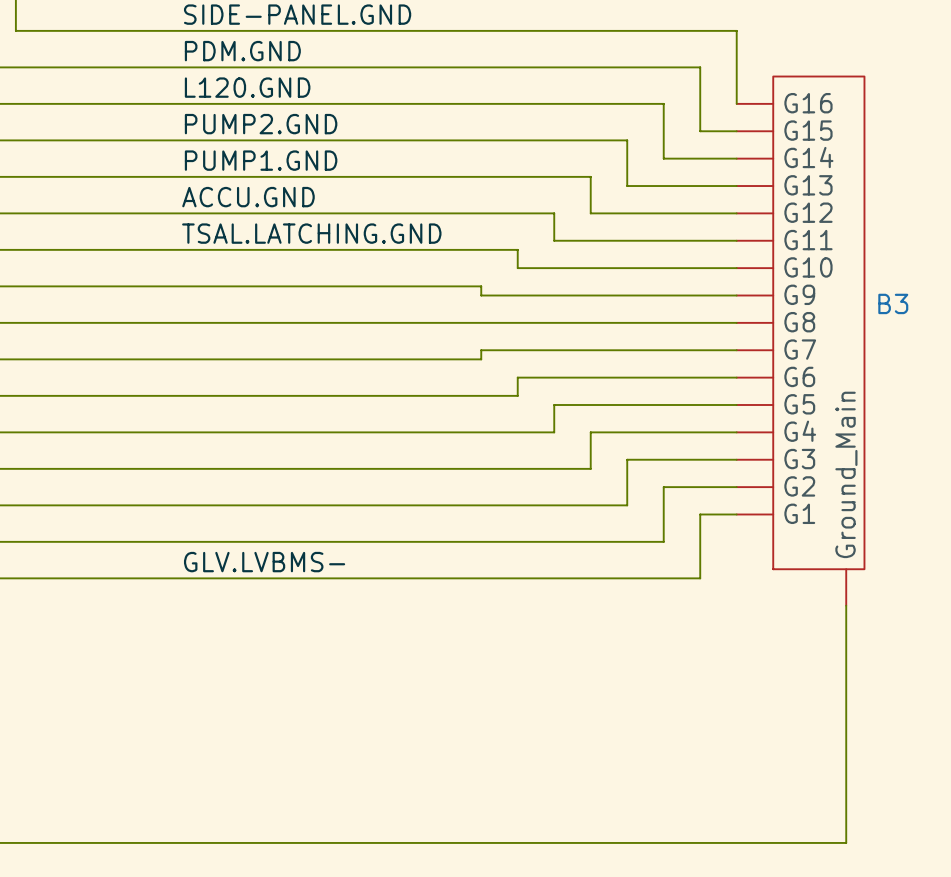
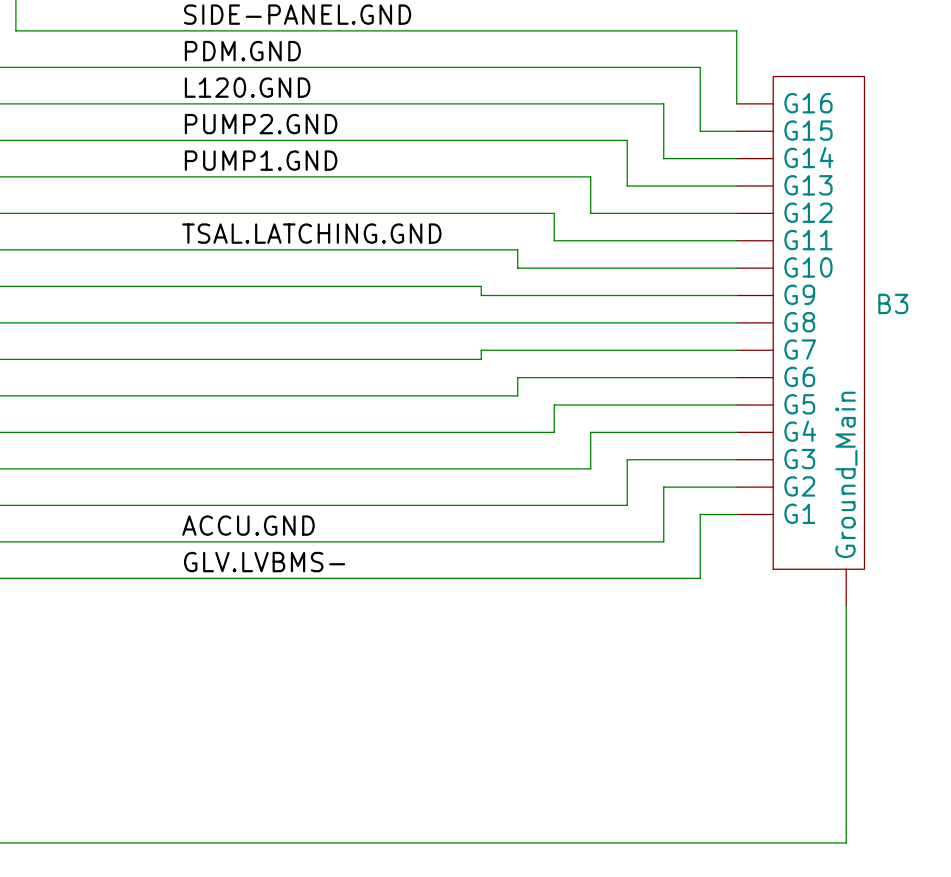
label position: ACCU.GND (248, 197) -> ACCU.GND (248, 525)

